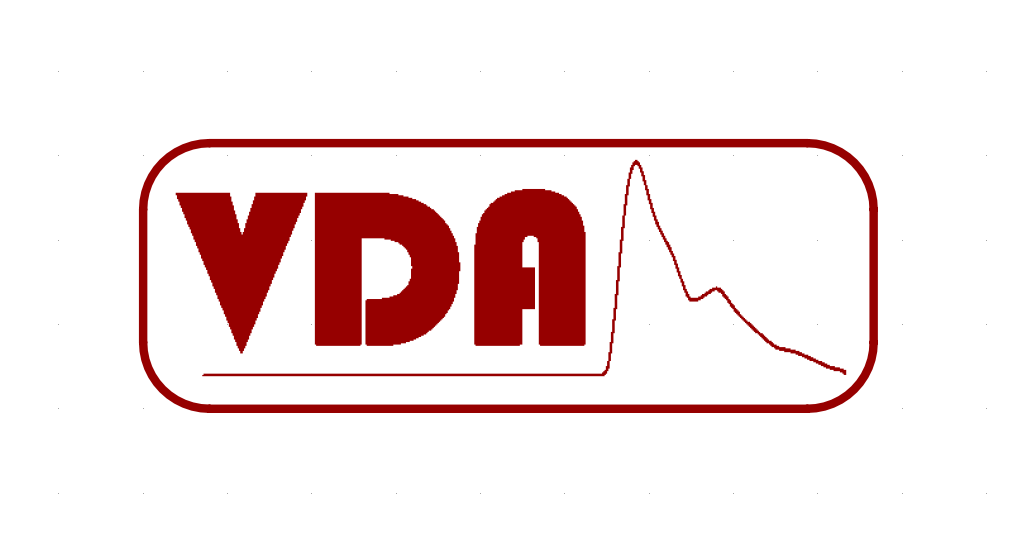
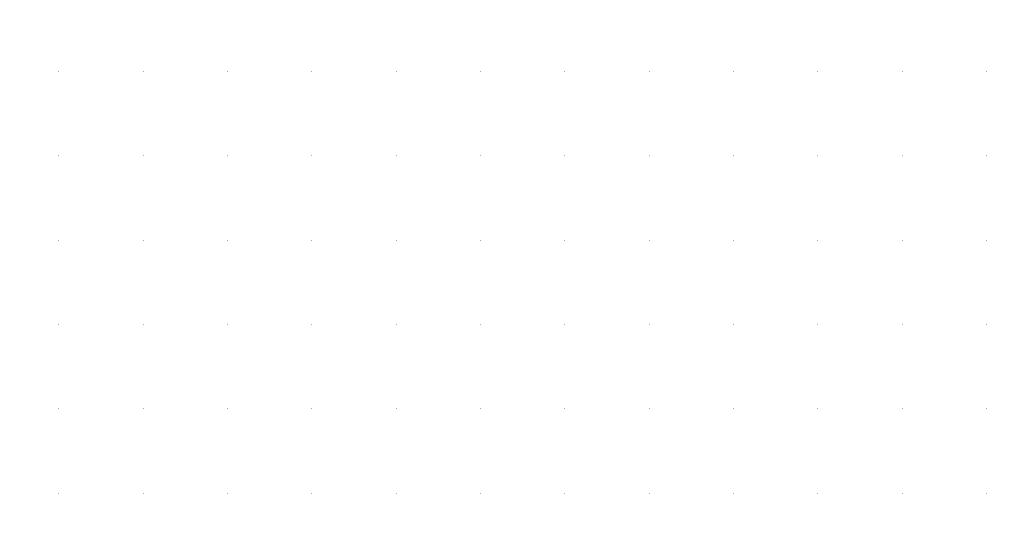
part: (508, 275) -> none

